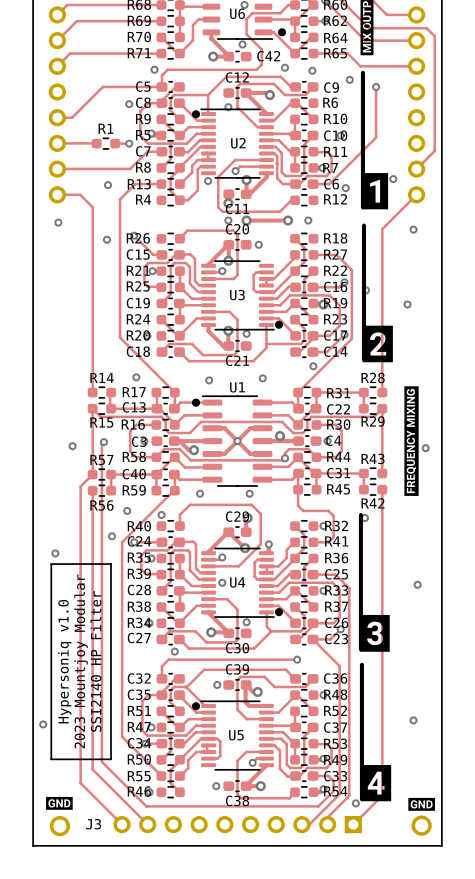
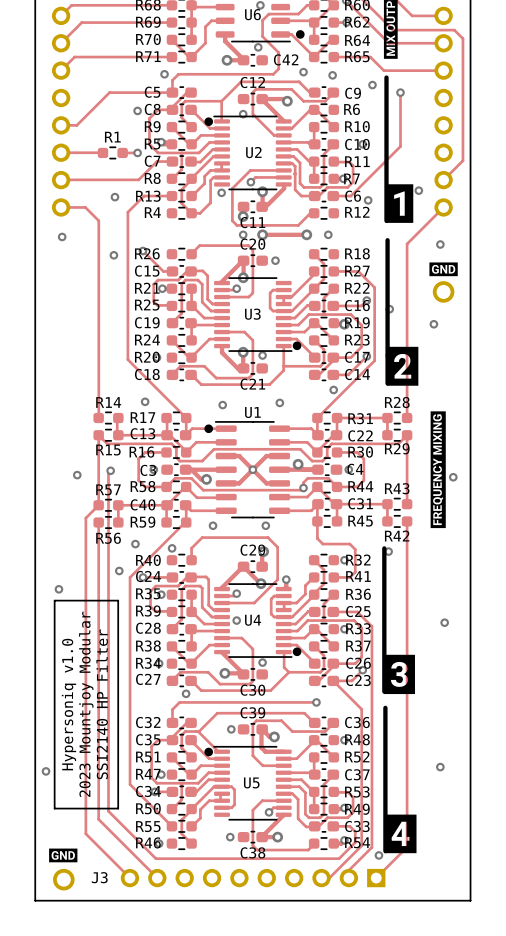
drawing: none -> [429, 262, 458, 277]
part: none -> (443, 291)
drawing: [408, 797, 435, 811] -> none
part: (421, 825) -> none

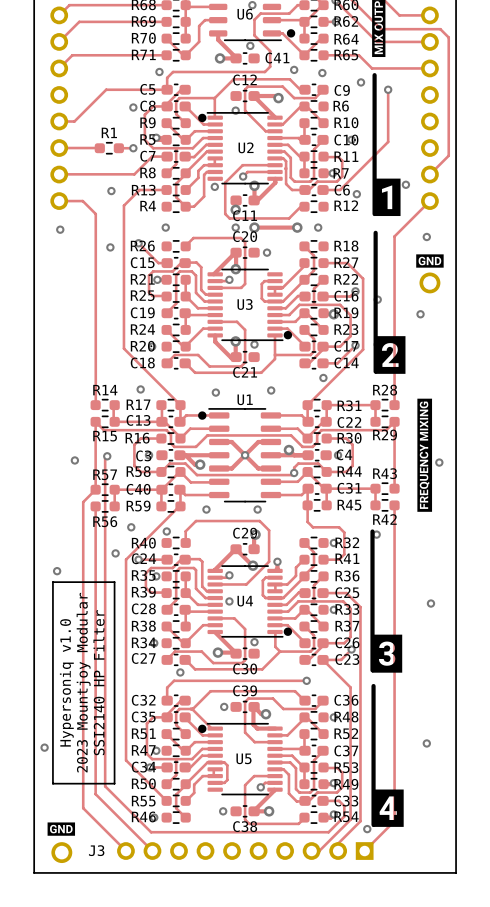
C42 name: C42 (286, 59) -> C41 (277, 58)
via: none -> (165, 227)

